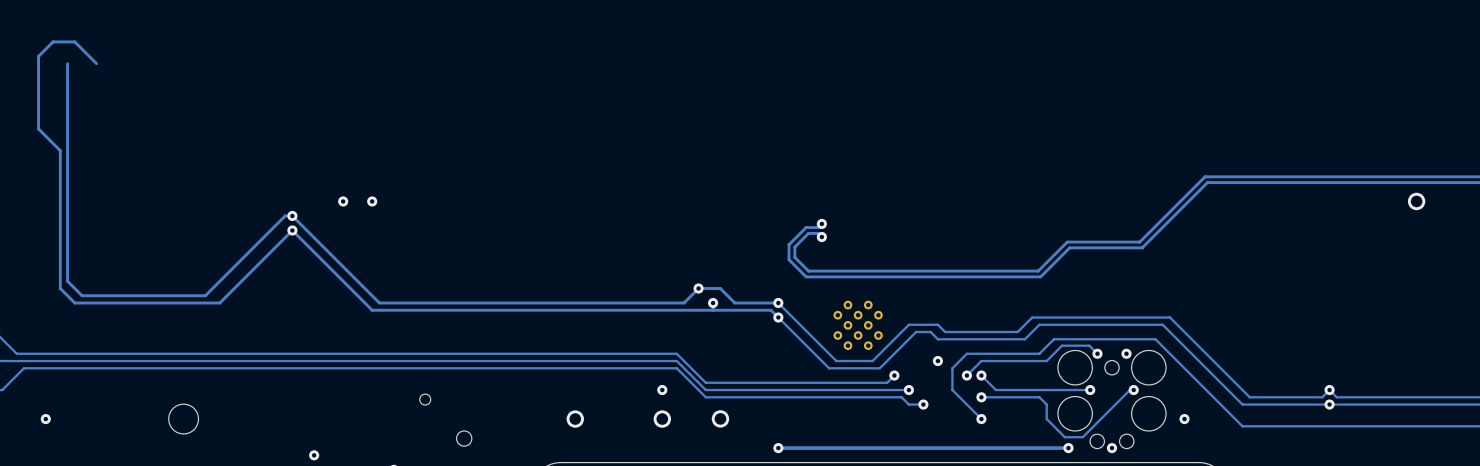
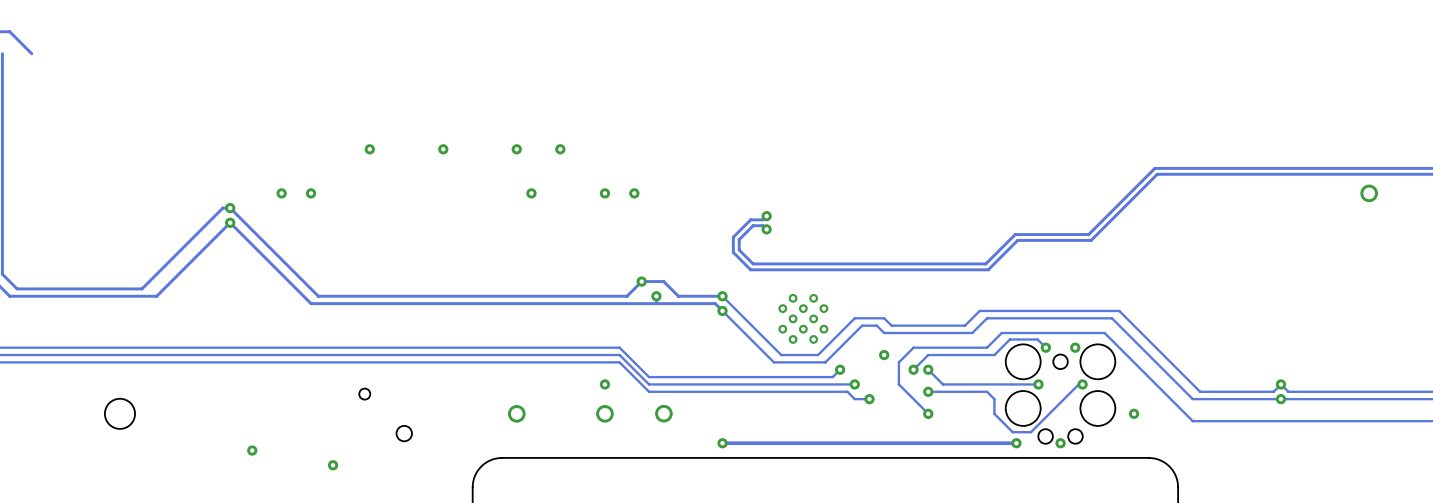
via: none -> (369, 149)
via: none -> (443, 149)
via: none -> (516, 149)
via: none -> (560, 149)
via: none -> (531, 193)
via: none -> (604, 193)
via: none -> (634, 193)

